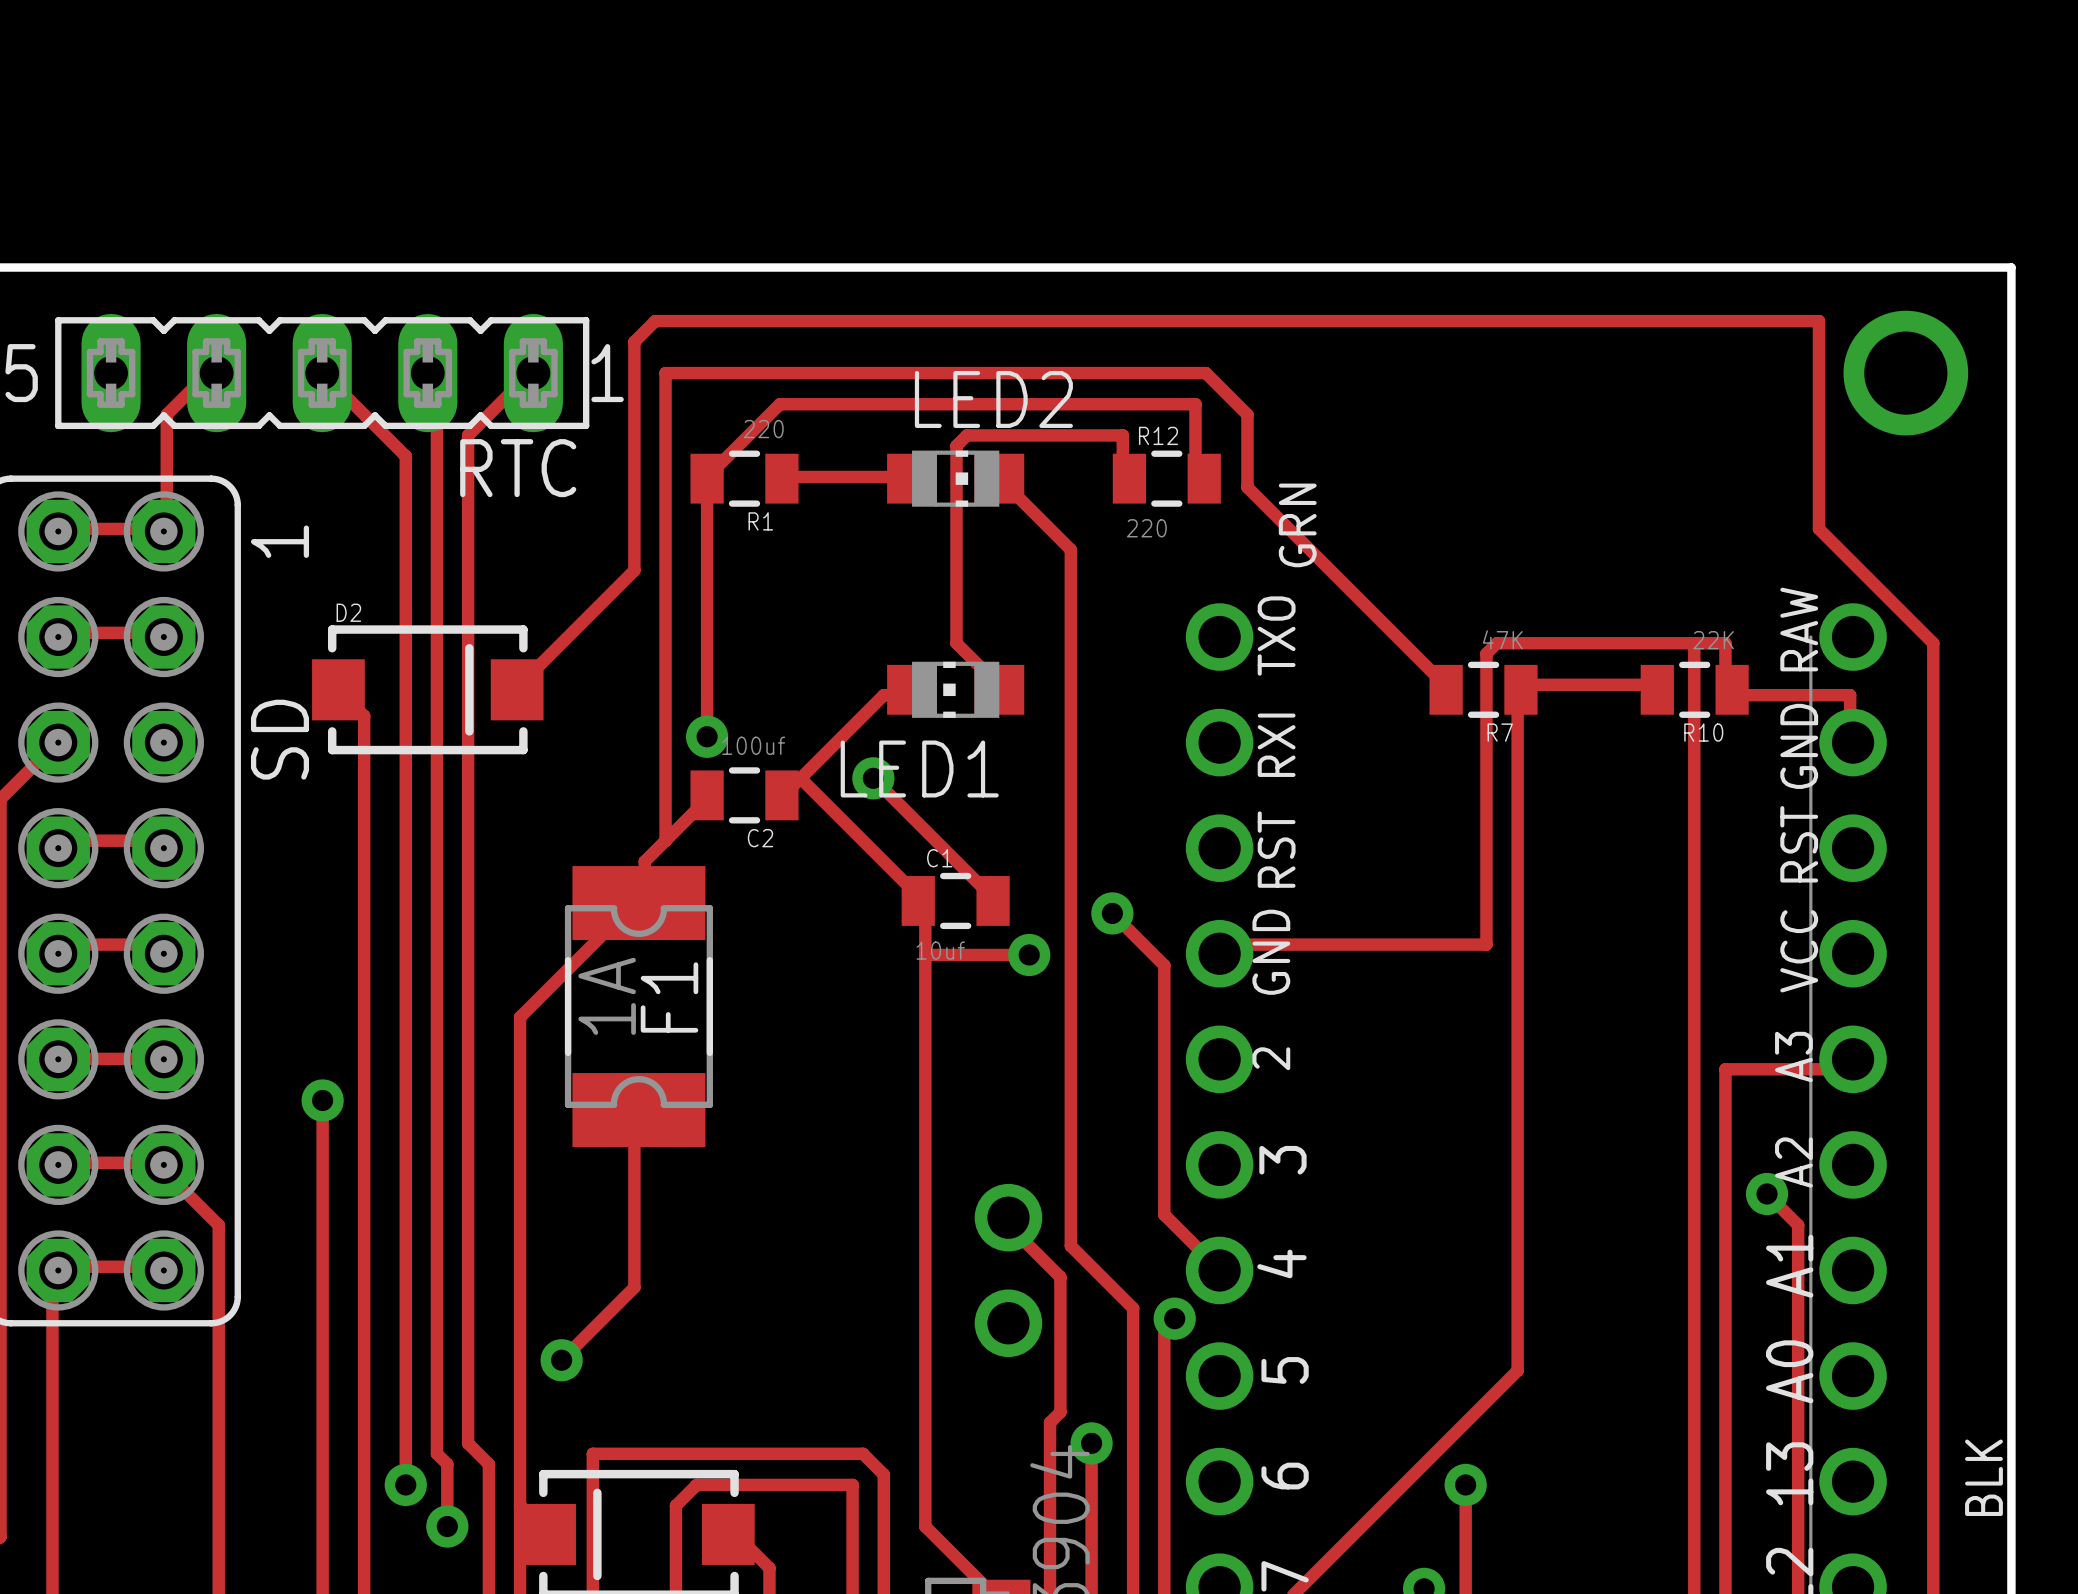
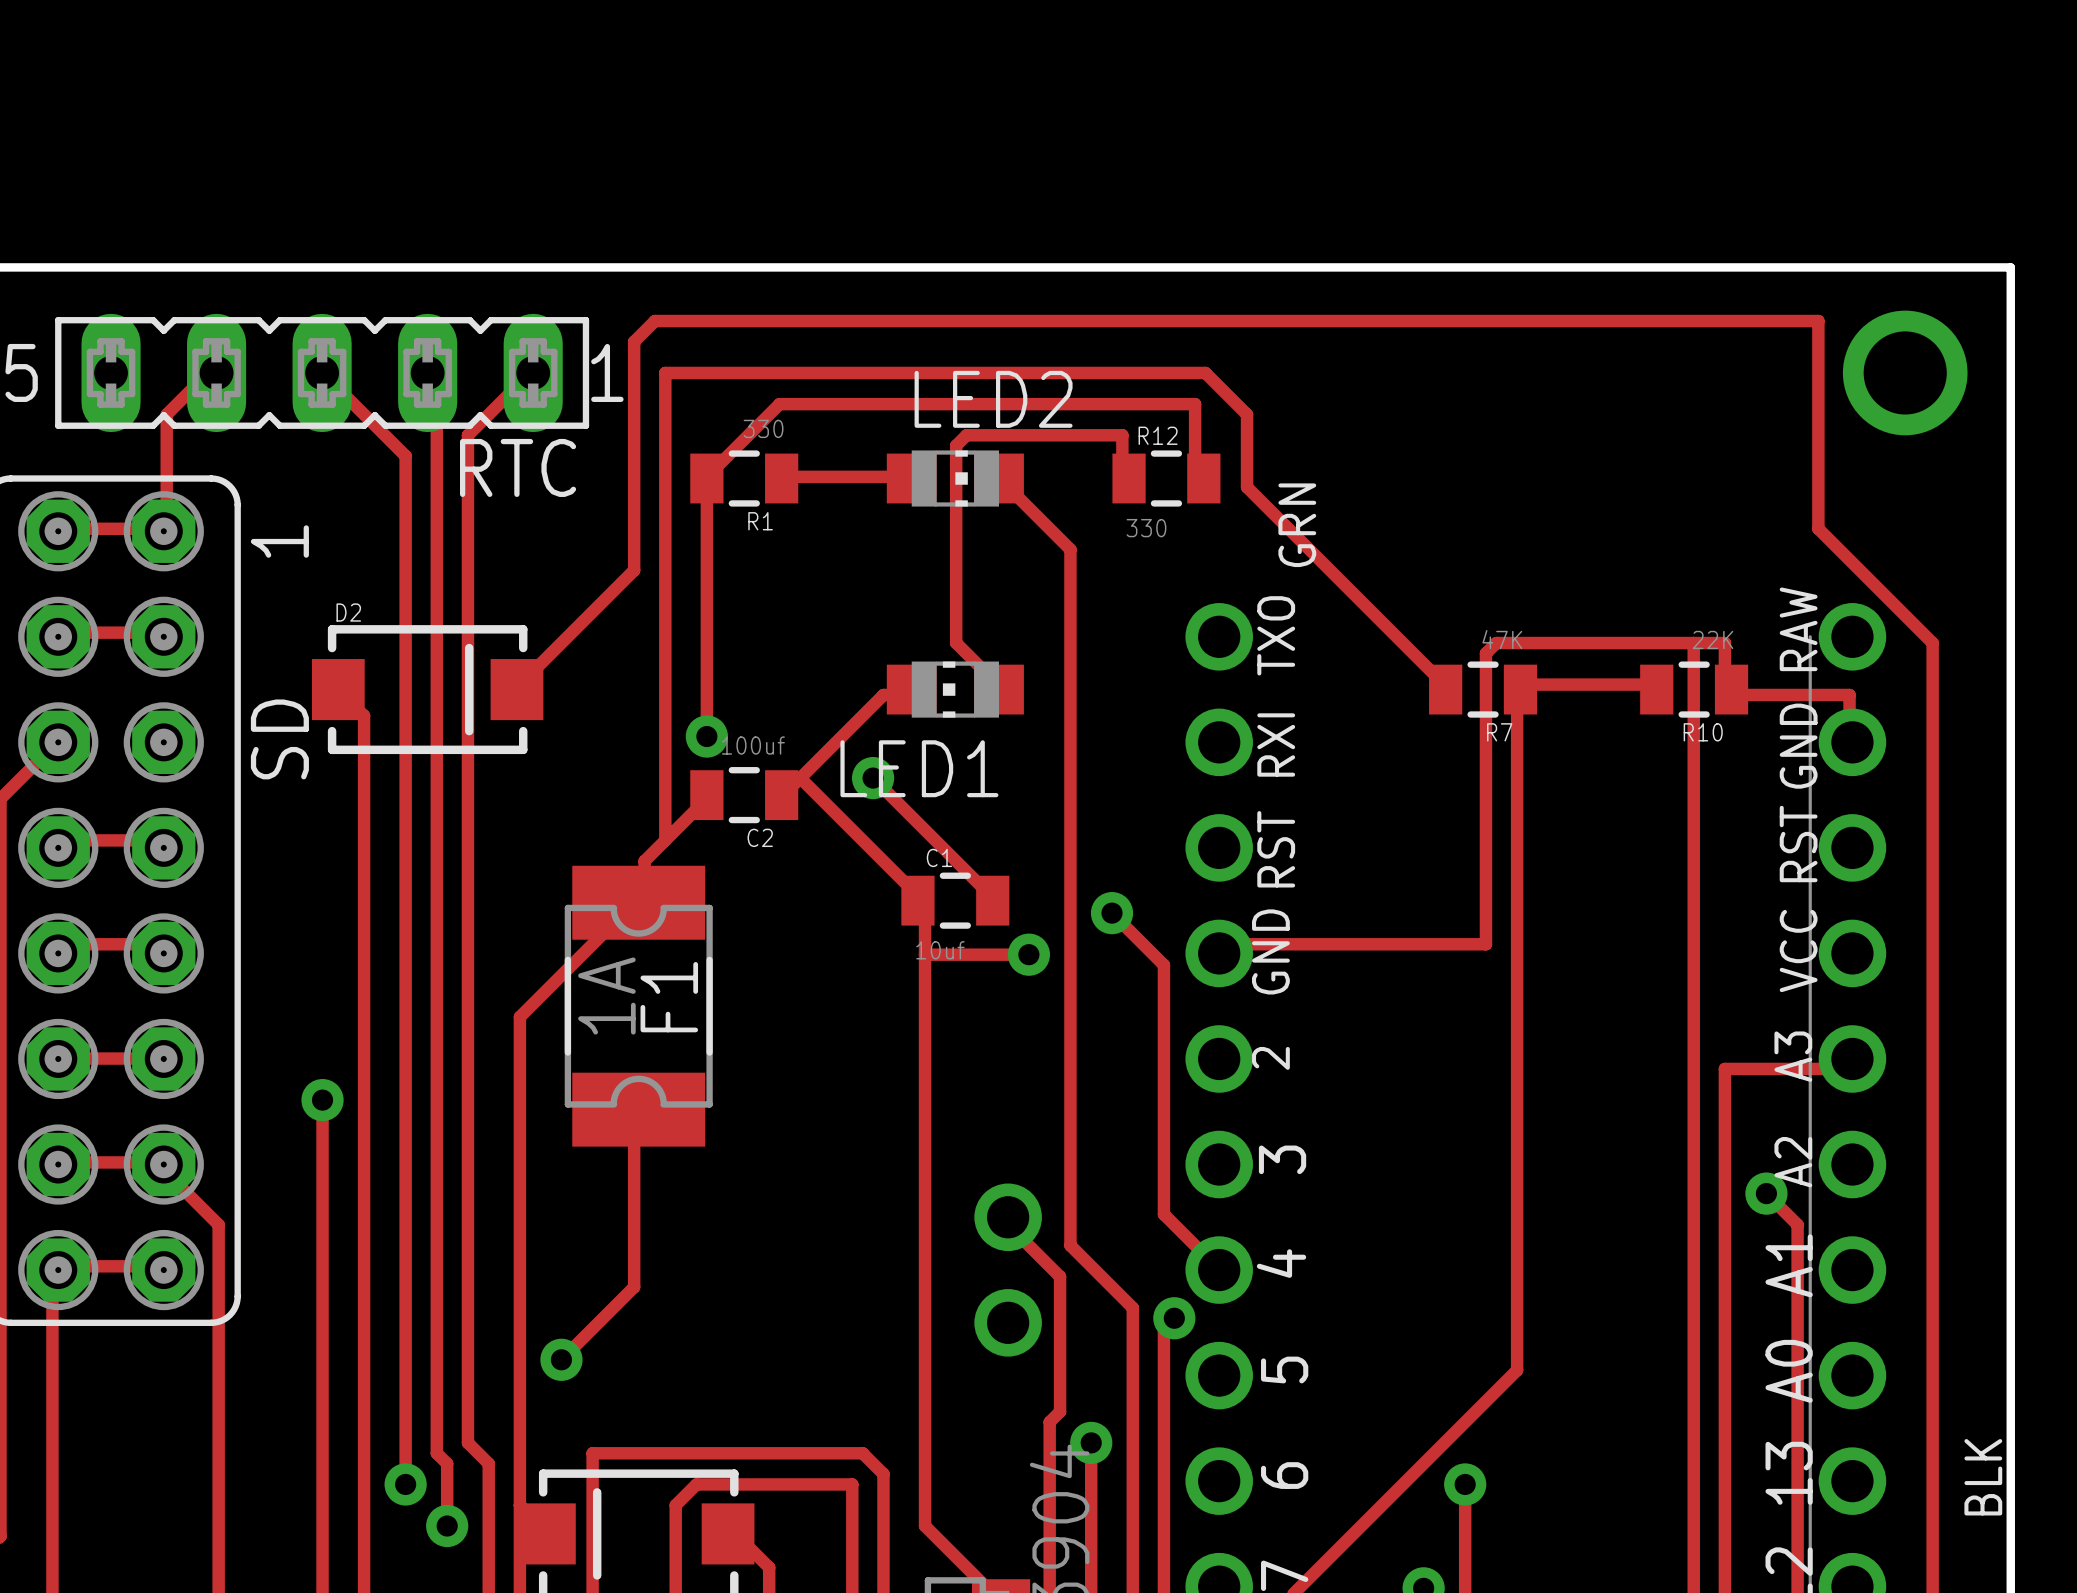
R1 value: 220 (763, 429) -> 330 (763, 428)
R12 value: 220 (1146, 528) -> 330 (1146, 528)

